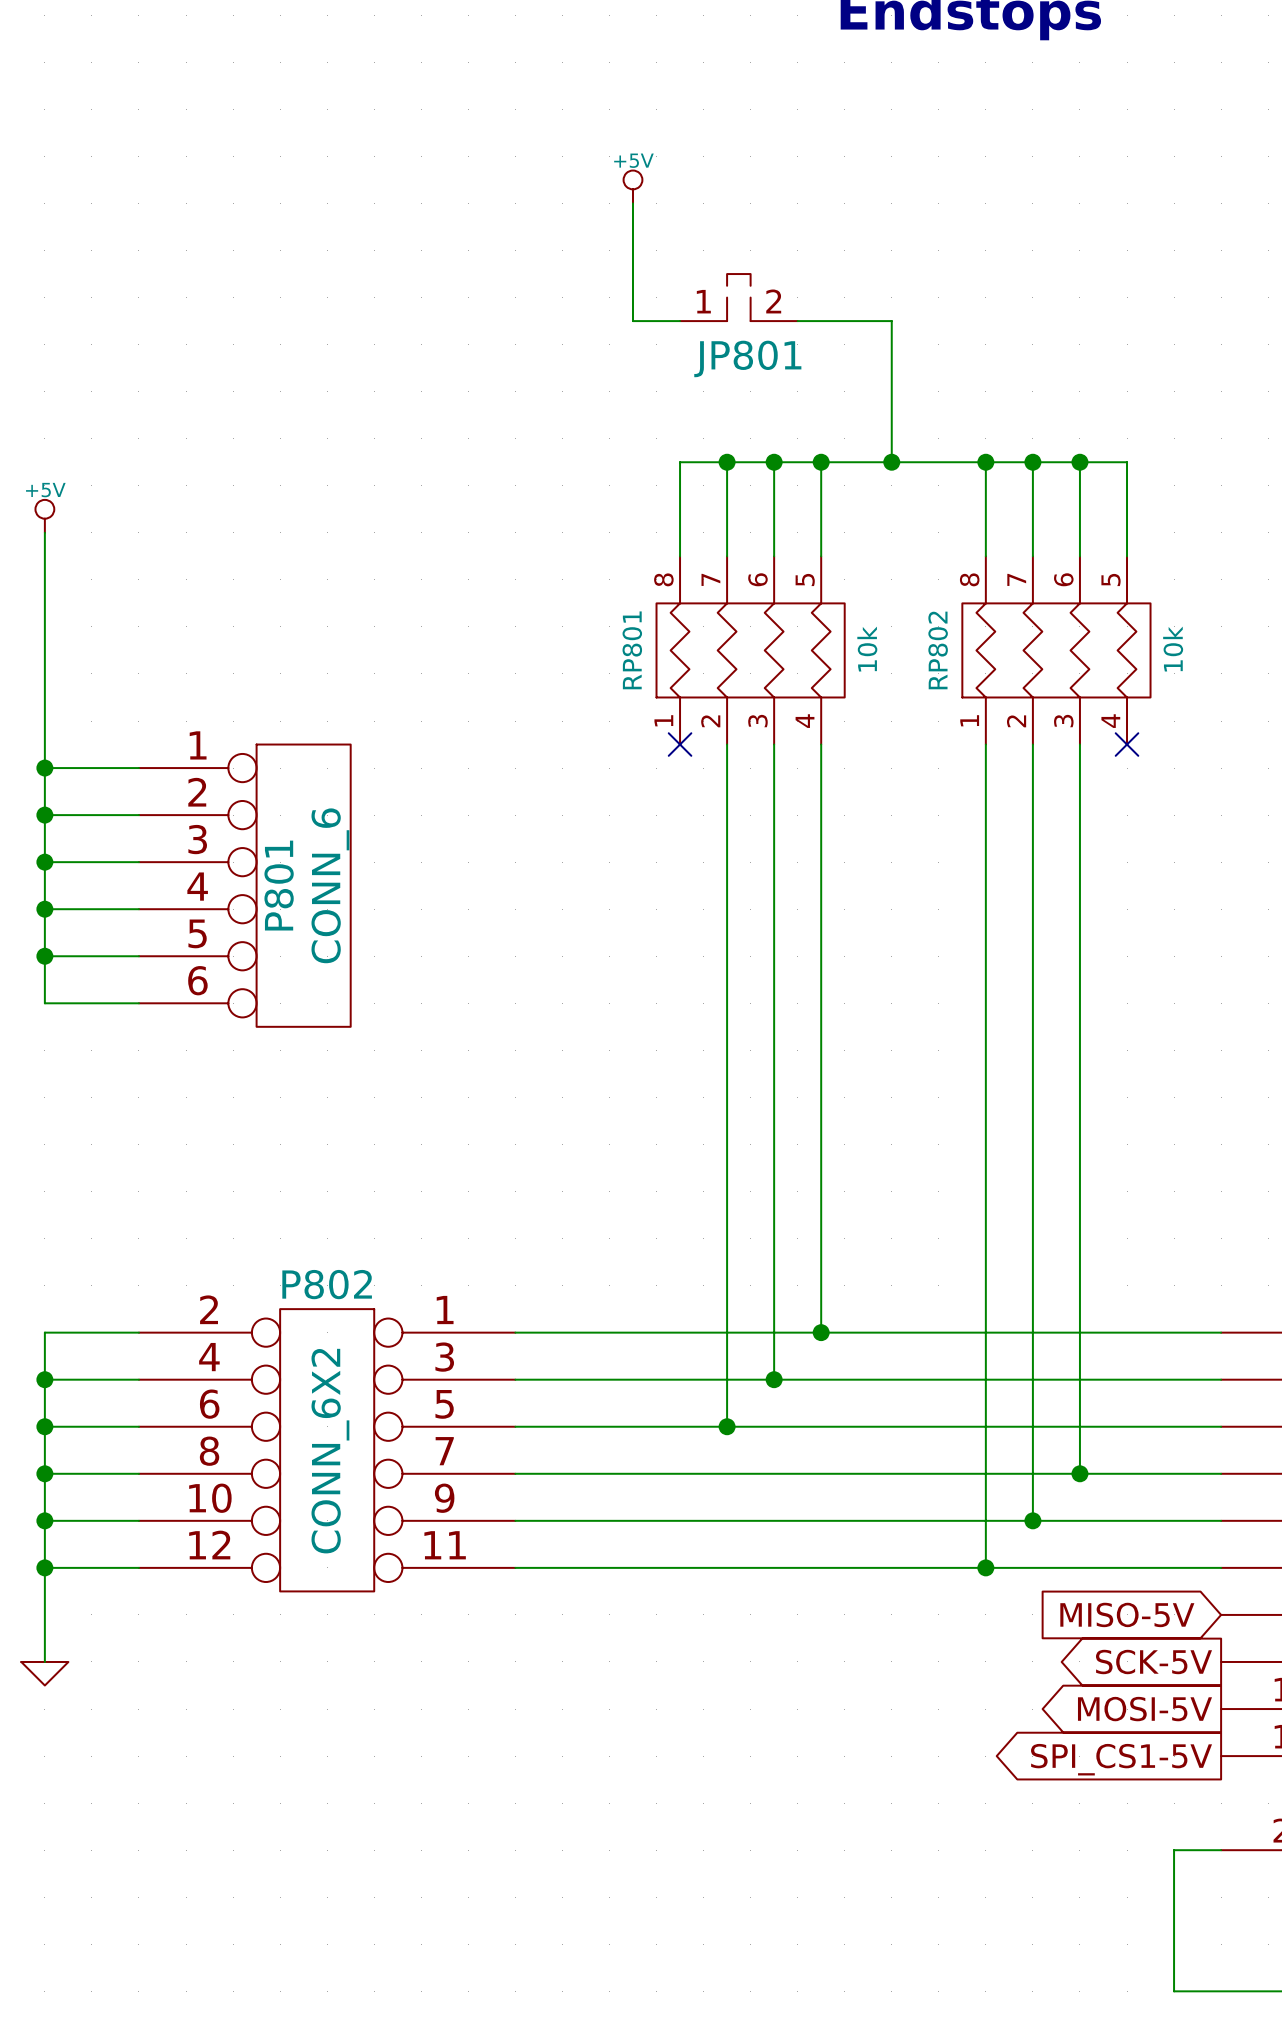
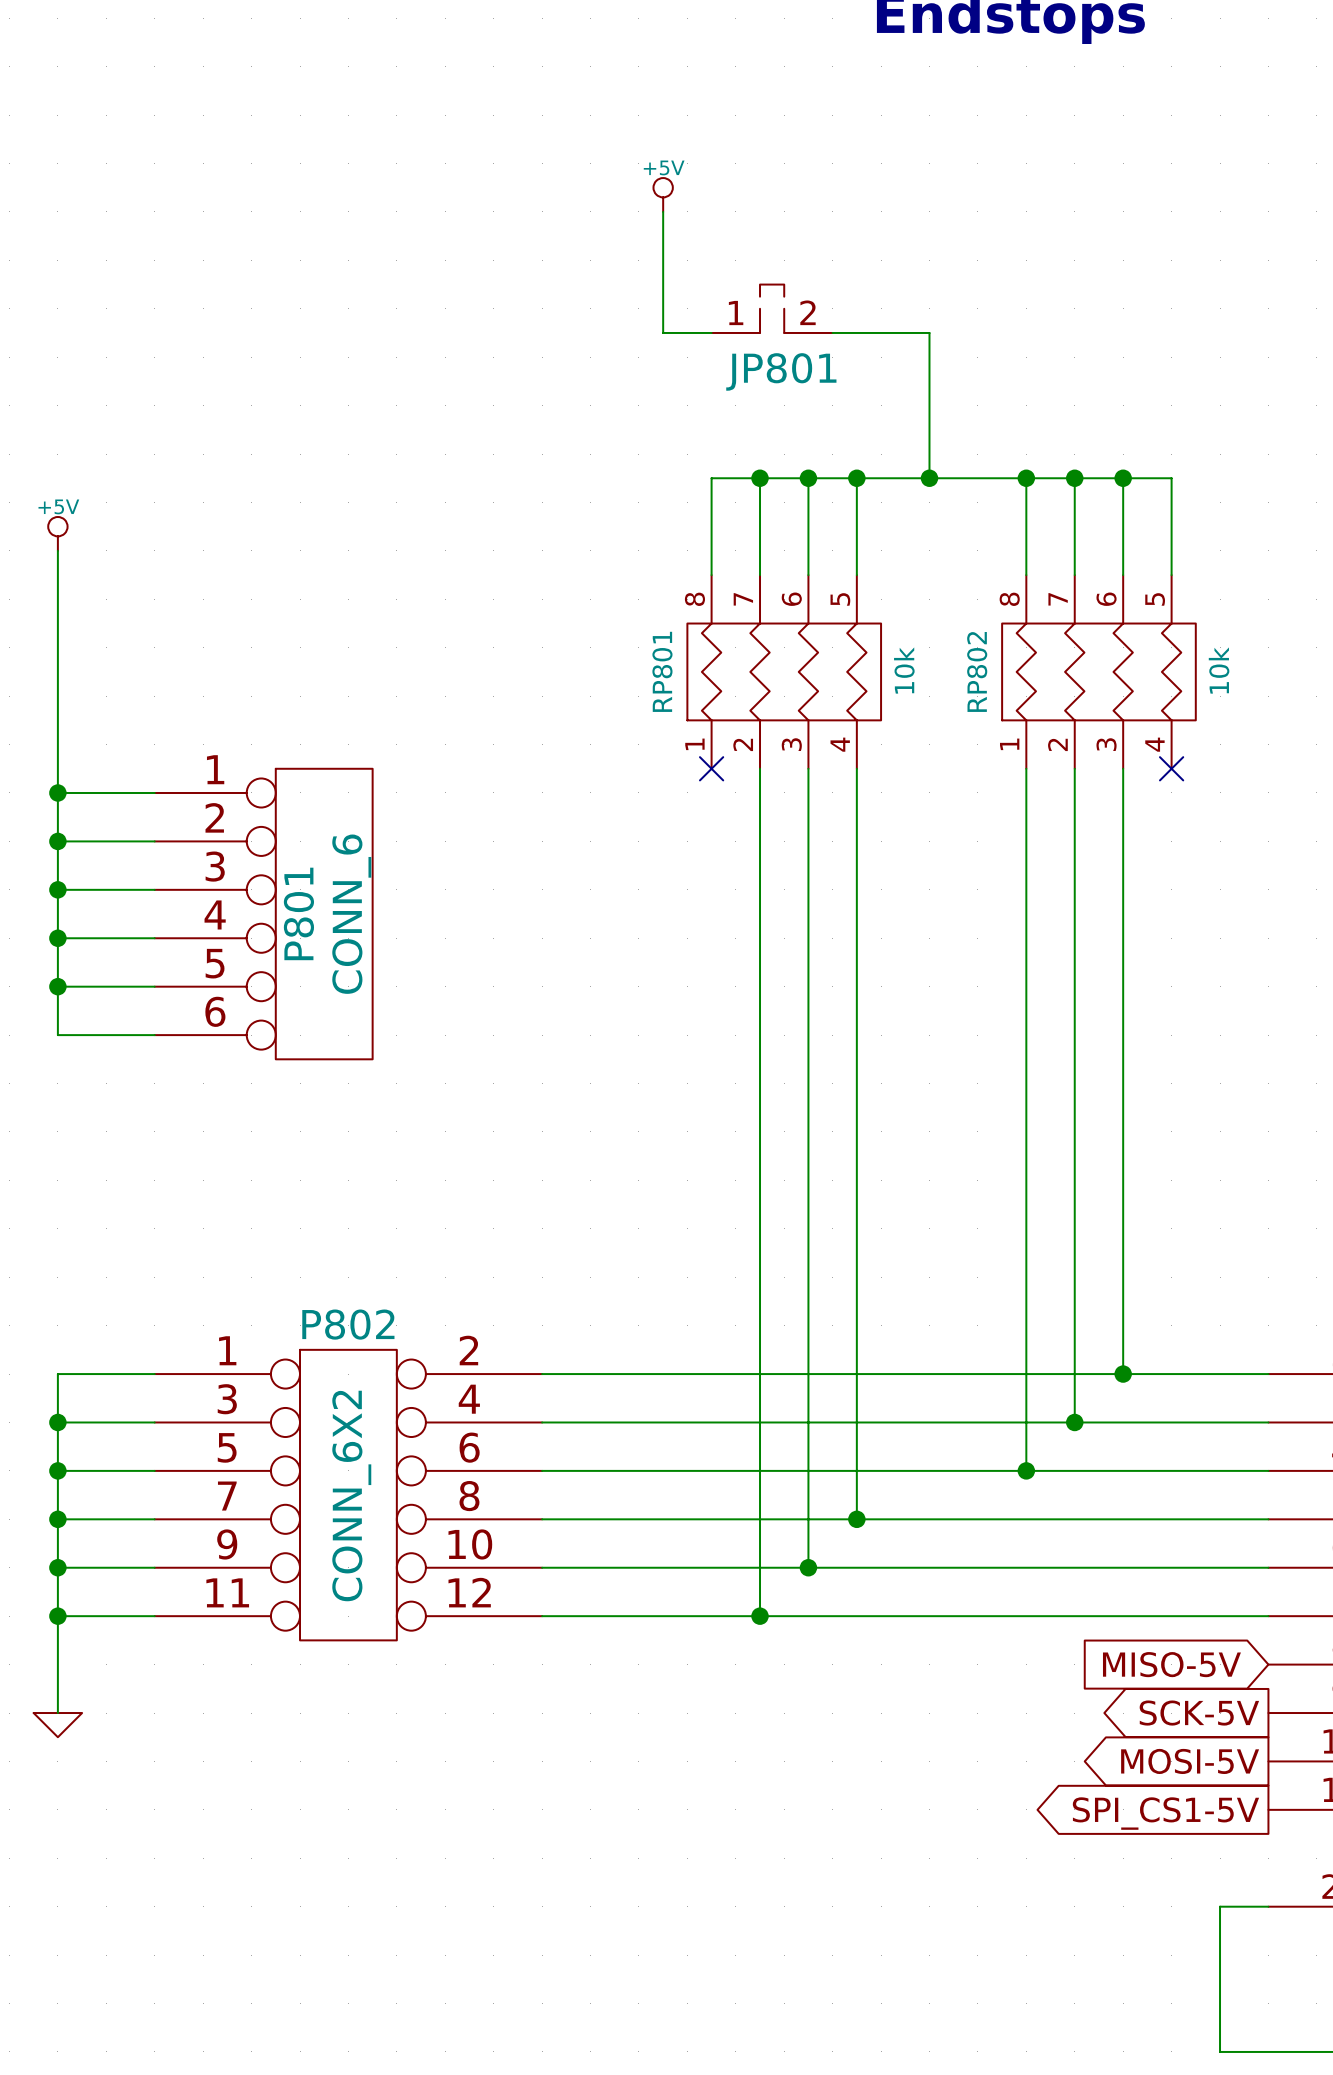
junction: (821, 1332) -> none
wire: (1079, 1332) (1079, 1473) -> (856, 1374) (856, 1519)
junction: none -> (1123, 1374)
junction: (774, 1379) -> none
wire: (1032, 1379) (1032, 1520) -> (808, 1422) (808, 1567)
junction: none -> (1074, 1422)
junction: (727, 1426) -> none
wire: (985, 1426) (985, 1567) -> (760, 1470) (760, 1616)
junction: none -> (1026, 1470)
P802 flip: as is (327, 1450) -> left-right (348, 1495)
junction: none -> (856, 1519)
junction: (1079, 1473) -> none
junction: none -> (808, 1567)
junction: (1032, 1520) -> none
junction: none -> (760, 1616)
junction: (985, 1567) -> none

